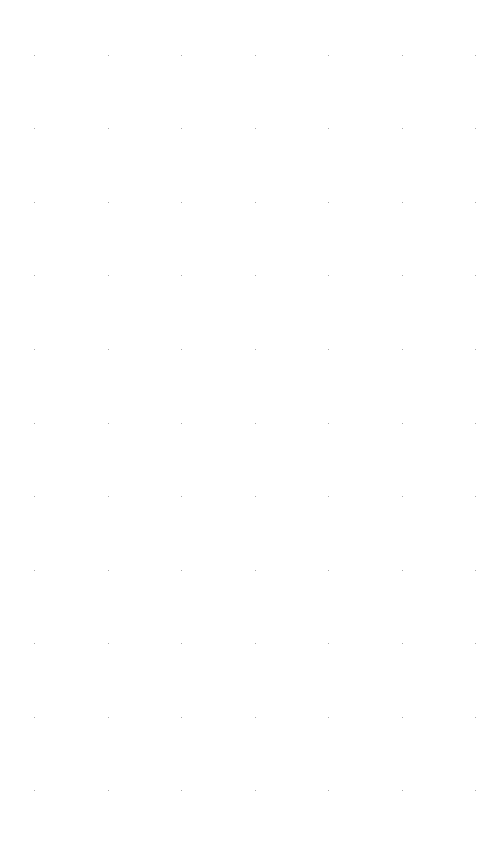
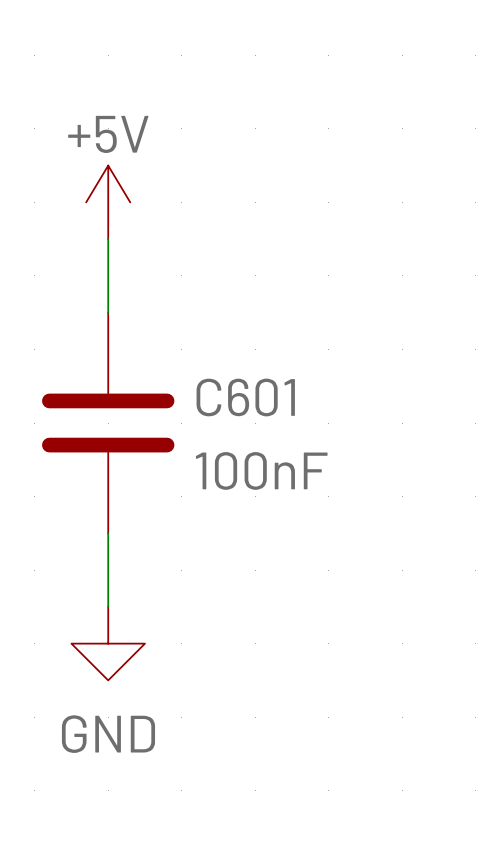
power symbol: none -> +5V (108, 202)
wire: none -> (108, 239) (108, 312)
C601: none -> 100nF (108, 423)
wire: none -> (108, 533) (108, 606)
power symbol: none -> GND (108, 643)

